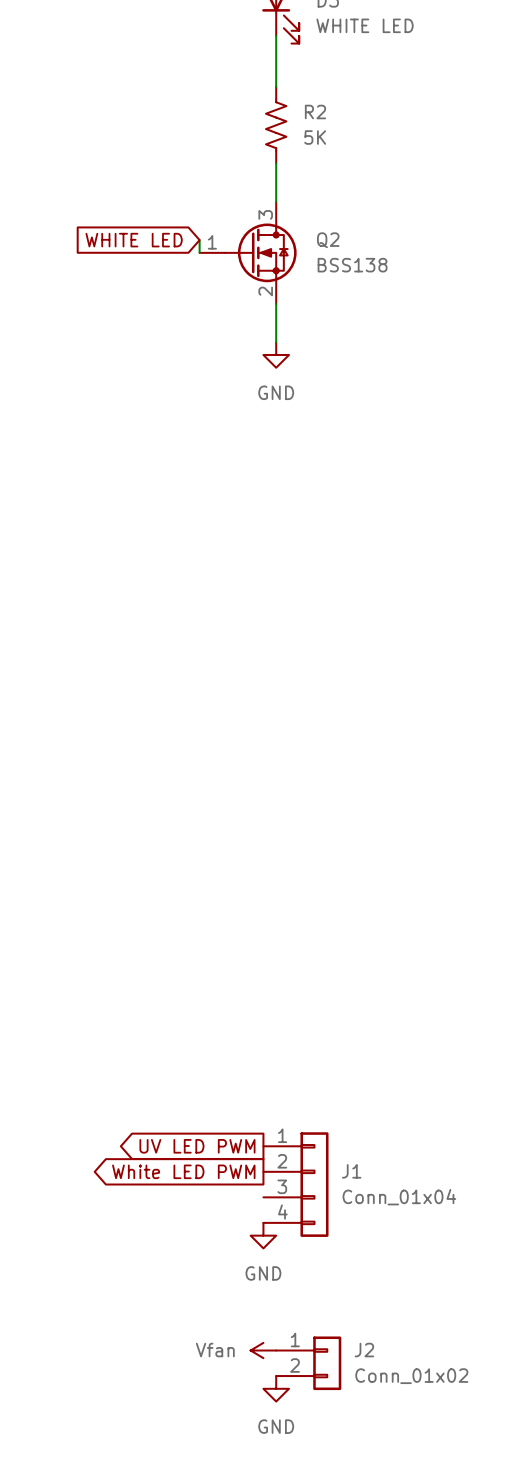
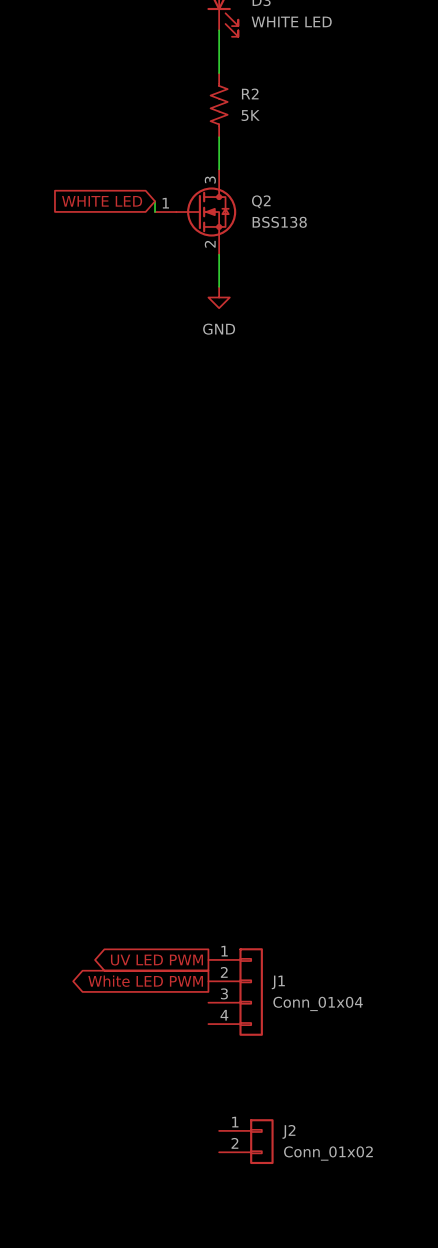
power symbol: GND (263, 1235) -> none
power symbol: Vfan (263, 1350) -> none
power symbol: GND (276, 1388) -> none

